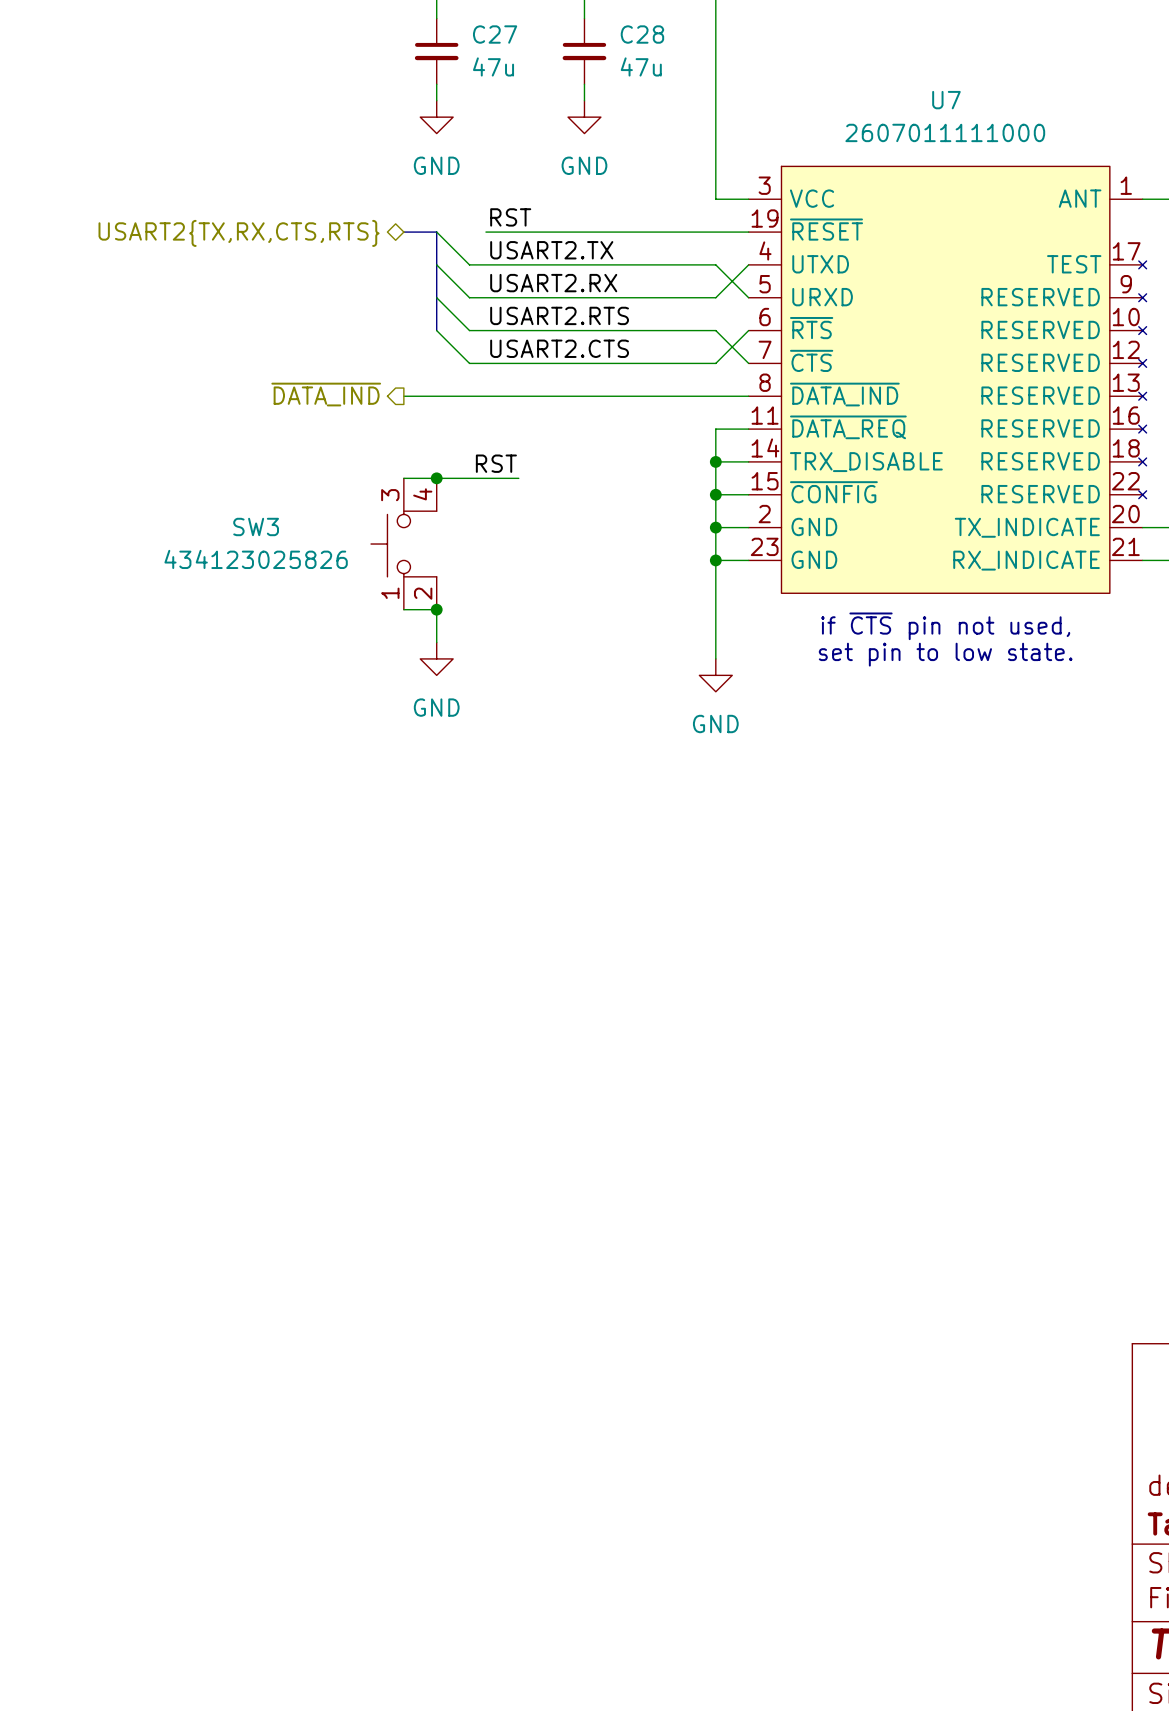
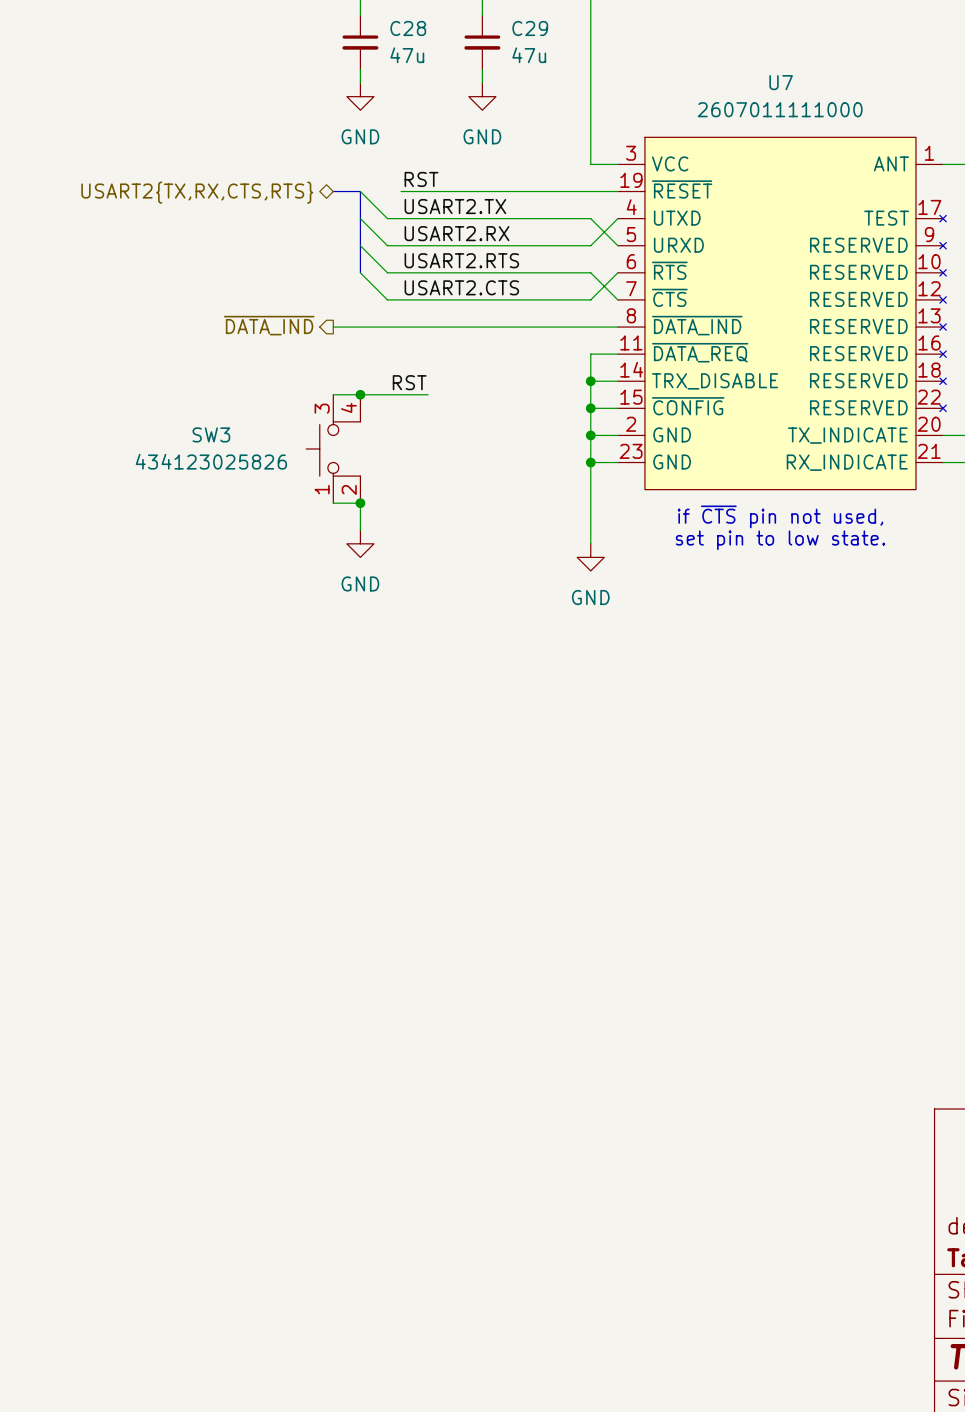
C27 name: C27 (495, 34) -> C28 (408, 28)
C28 name: C28 (642, 34) -> C29 (530, 28)

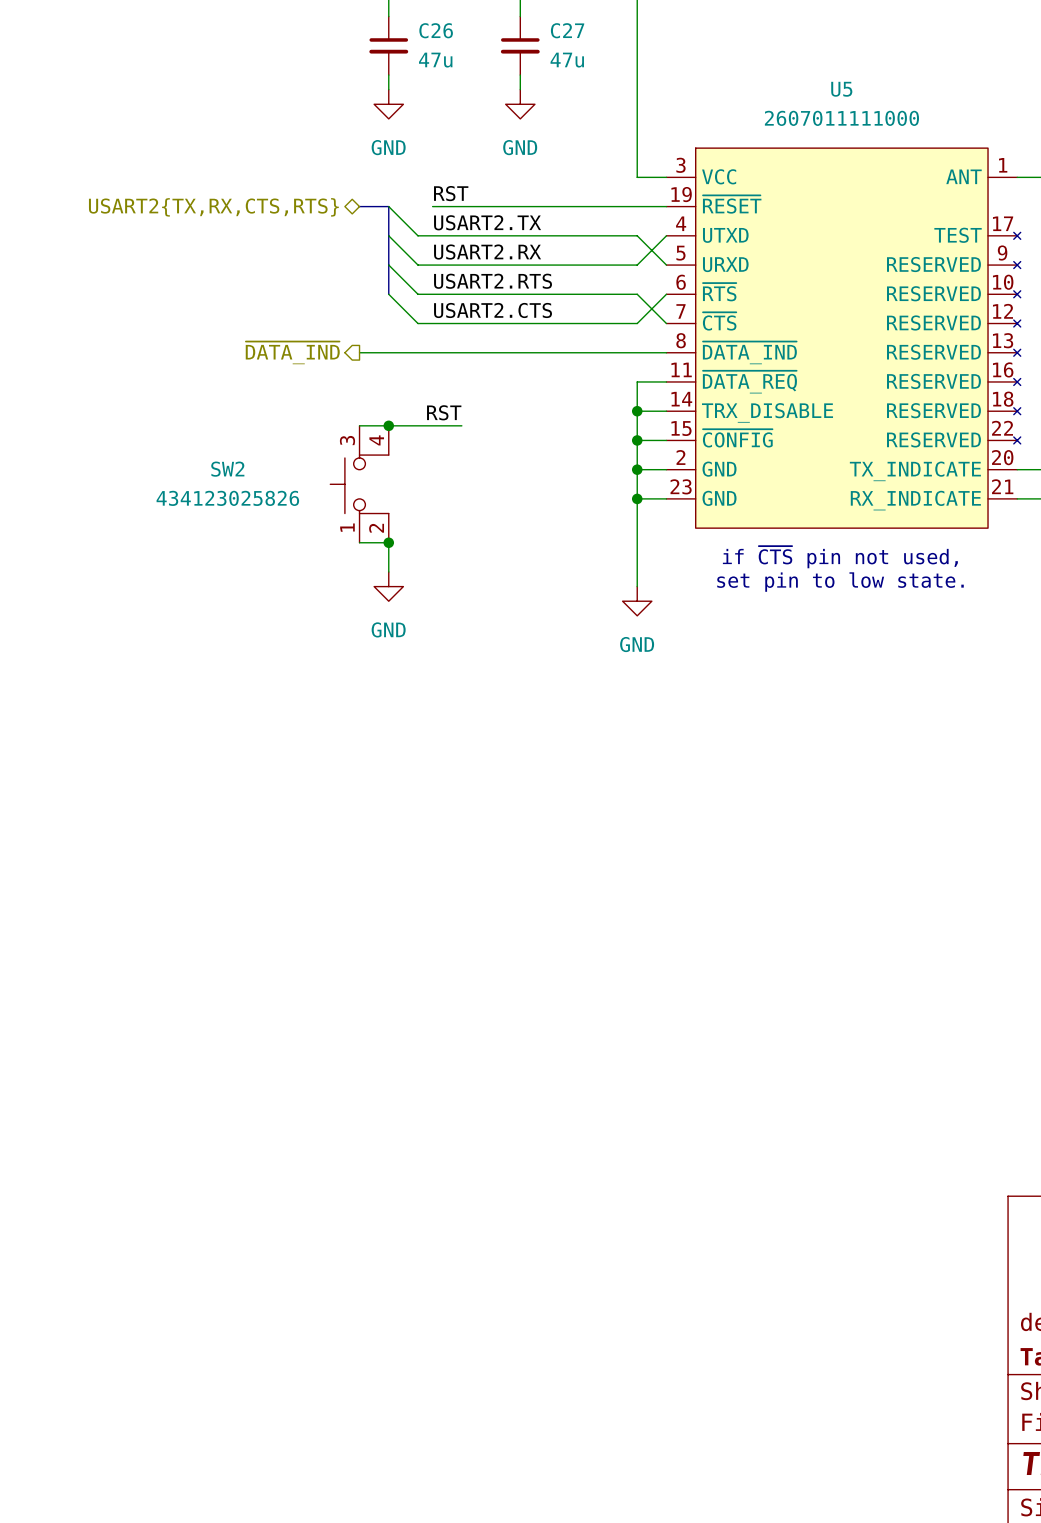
C28 name: C28 (408, 28) -> C26 (436, 30)
C29 name: C29 (530, 28) -> C27 (567, 30)
U7 name: U7 (781, 82) -> U5 (841, 89)
SW3 name: SW3 (211, 434) -> SW2 (227, 469)

